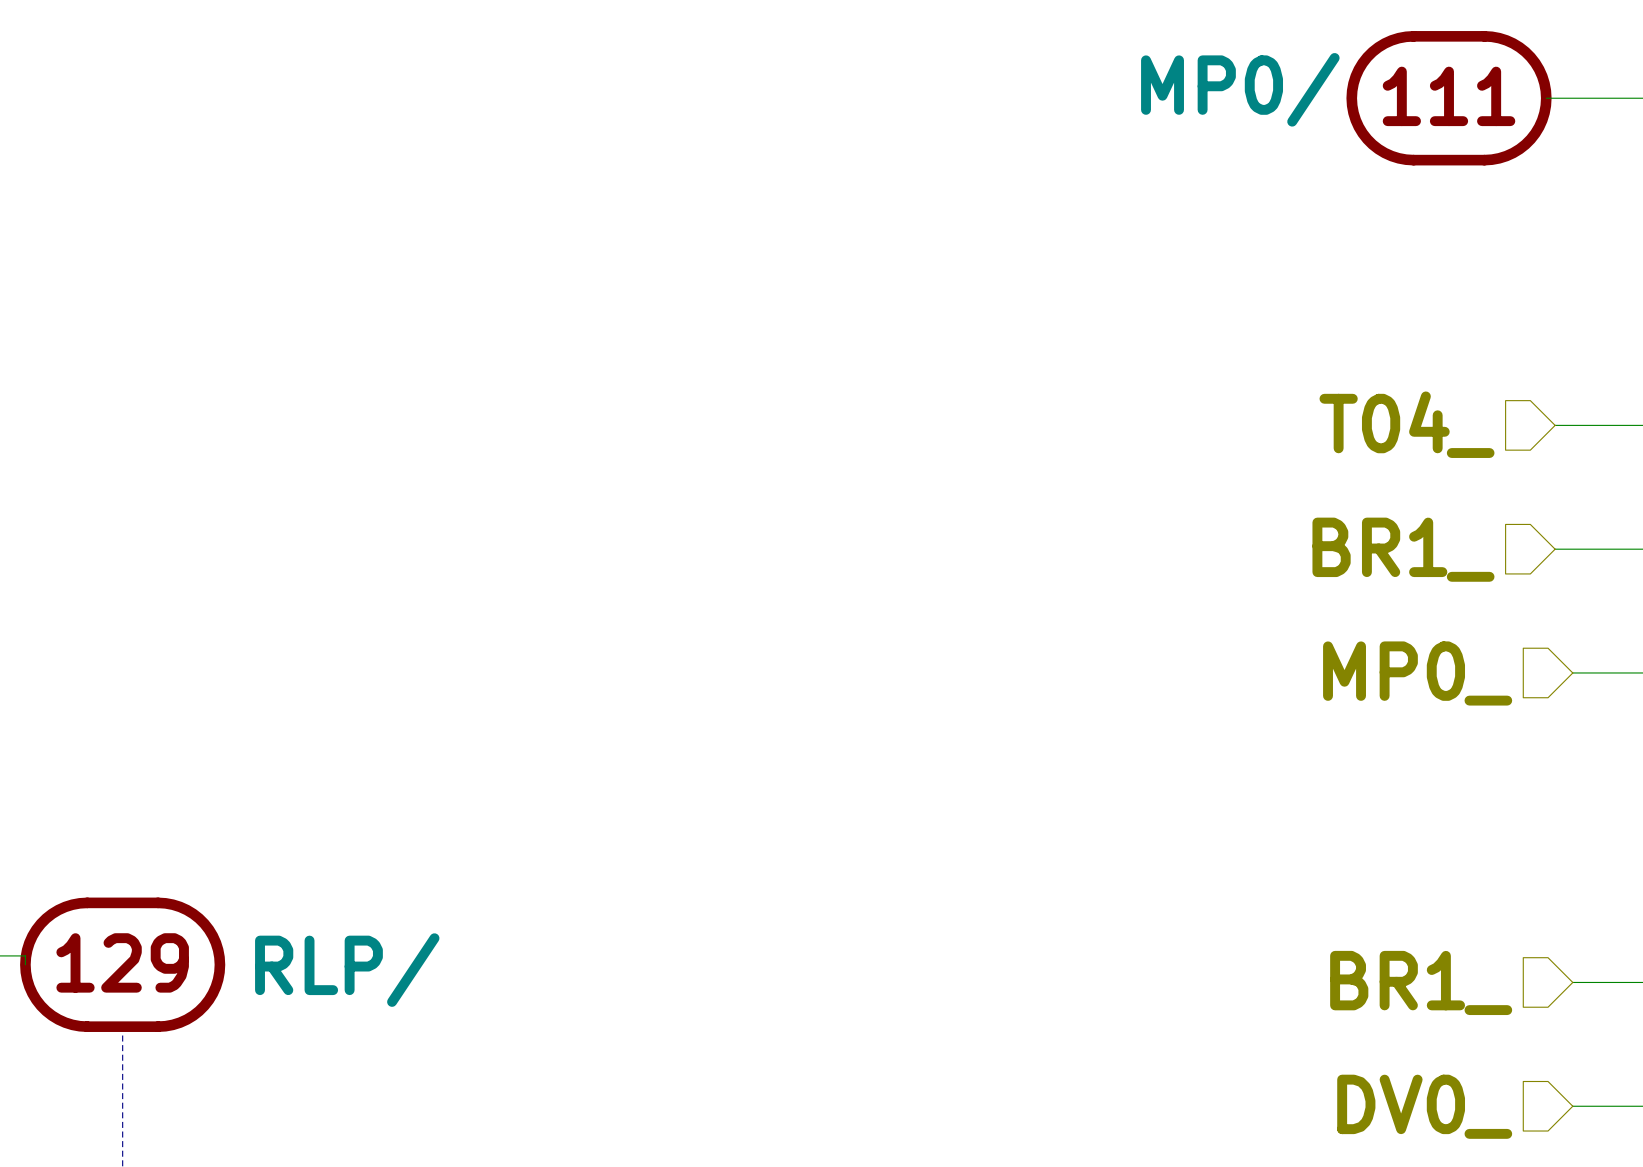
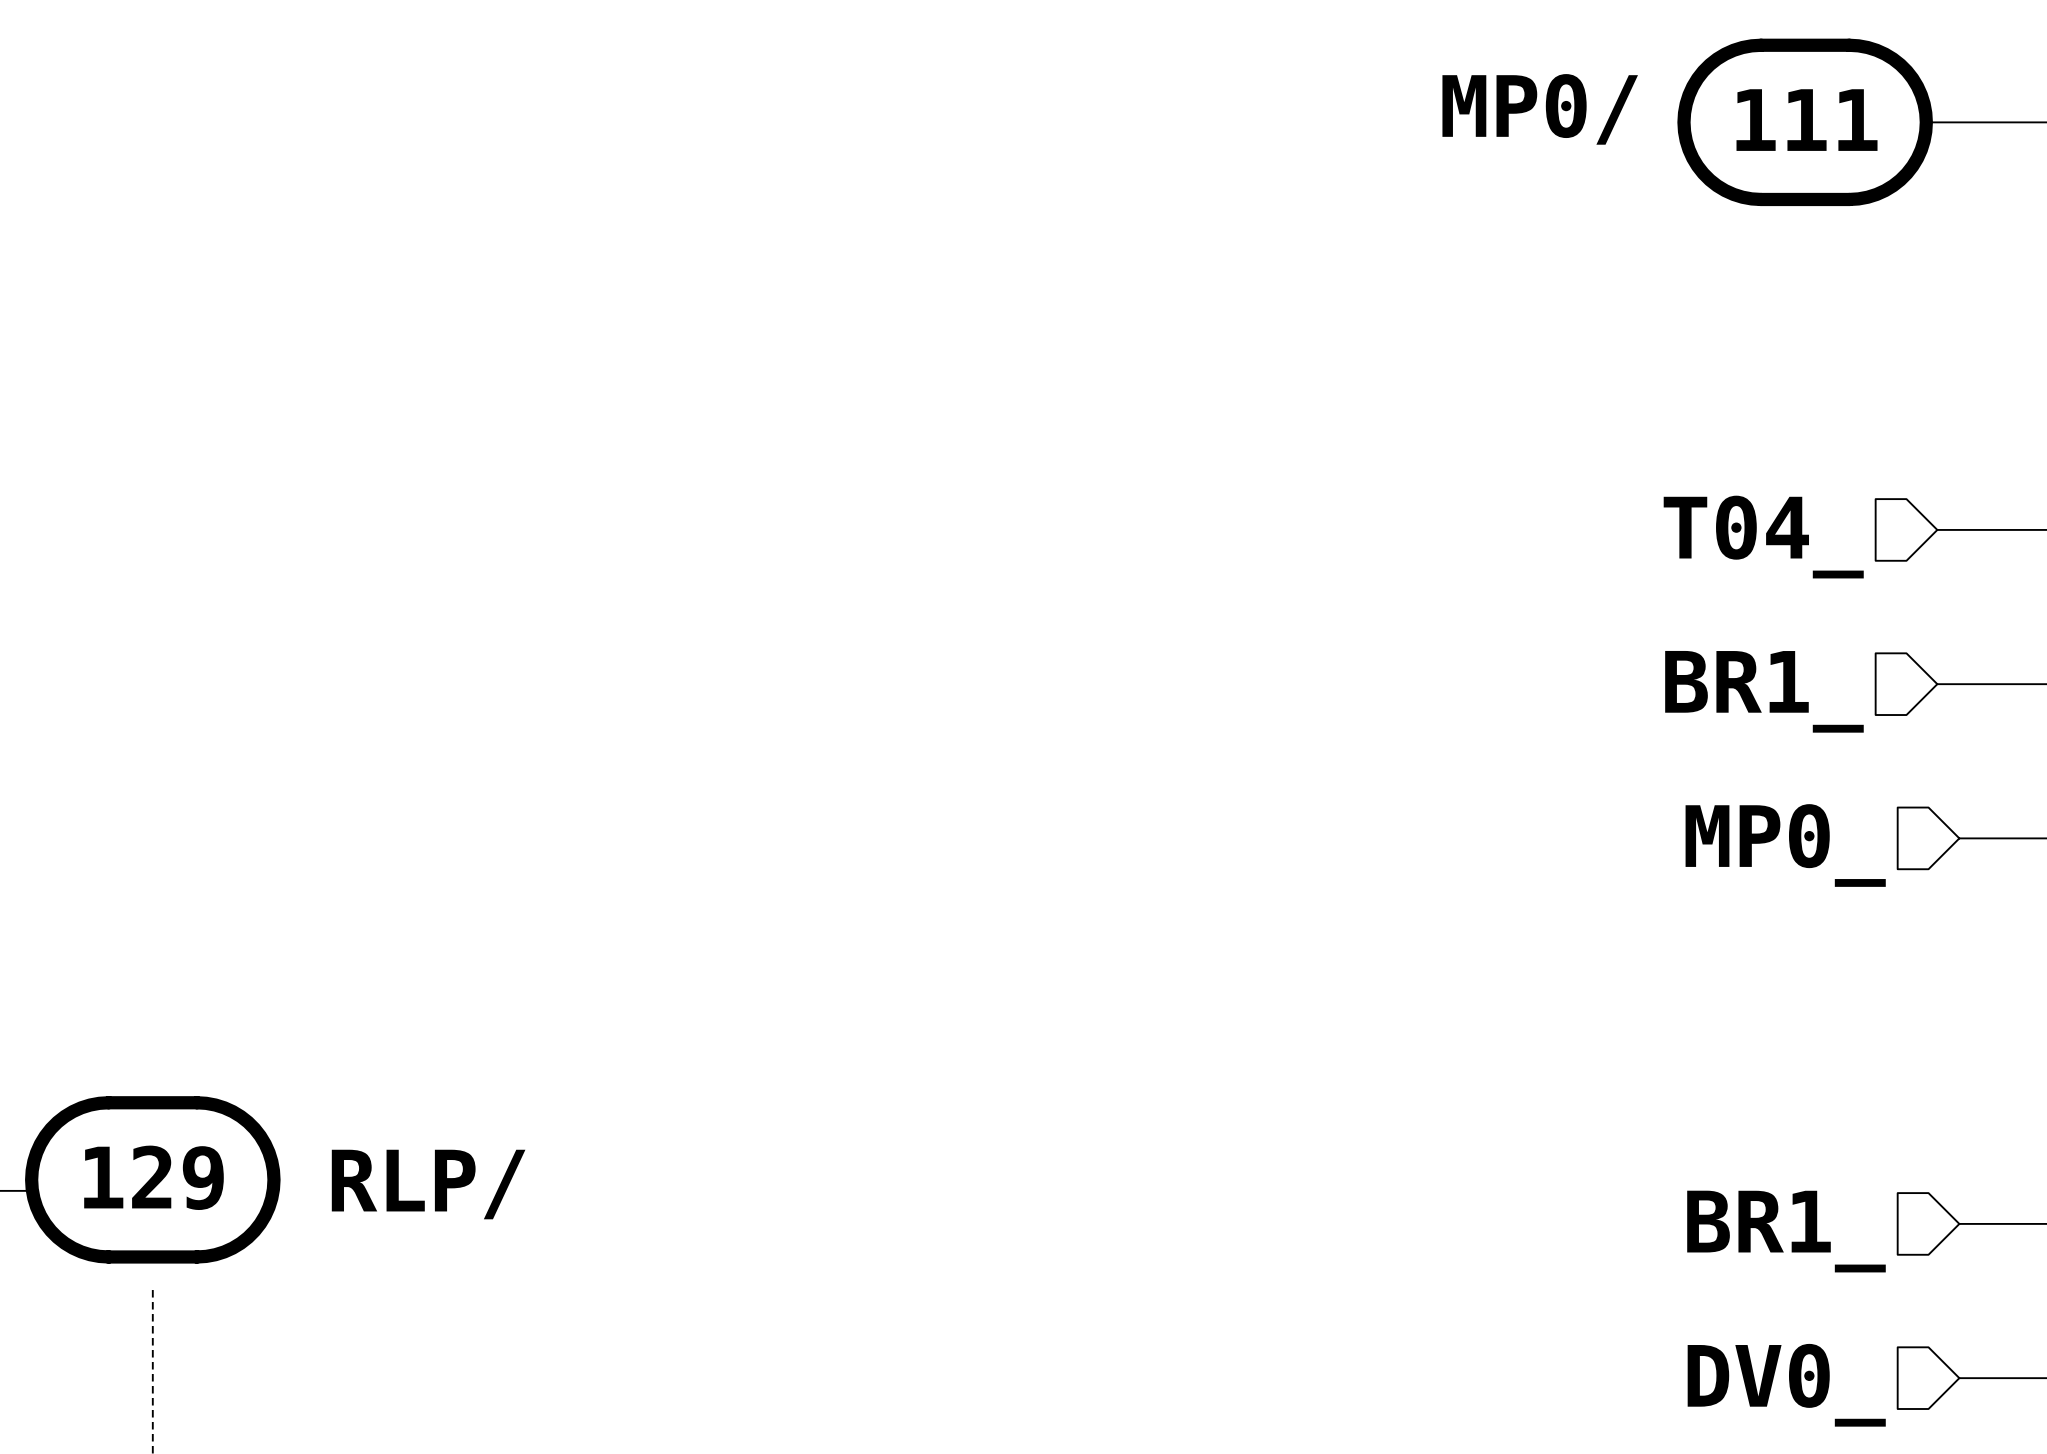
part position: (122, 964) -> (152, 1179)

